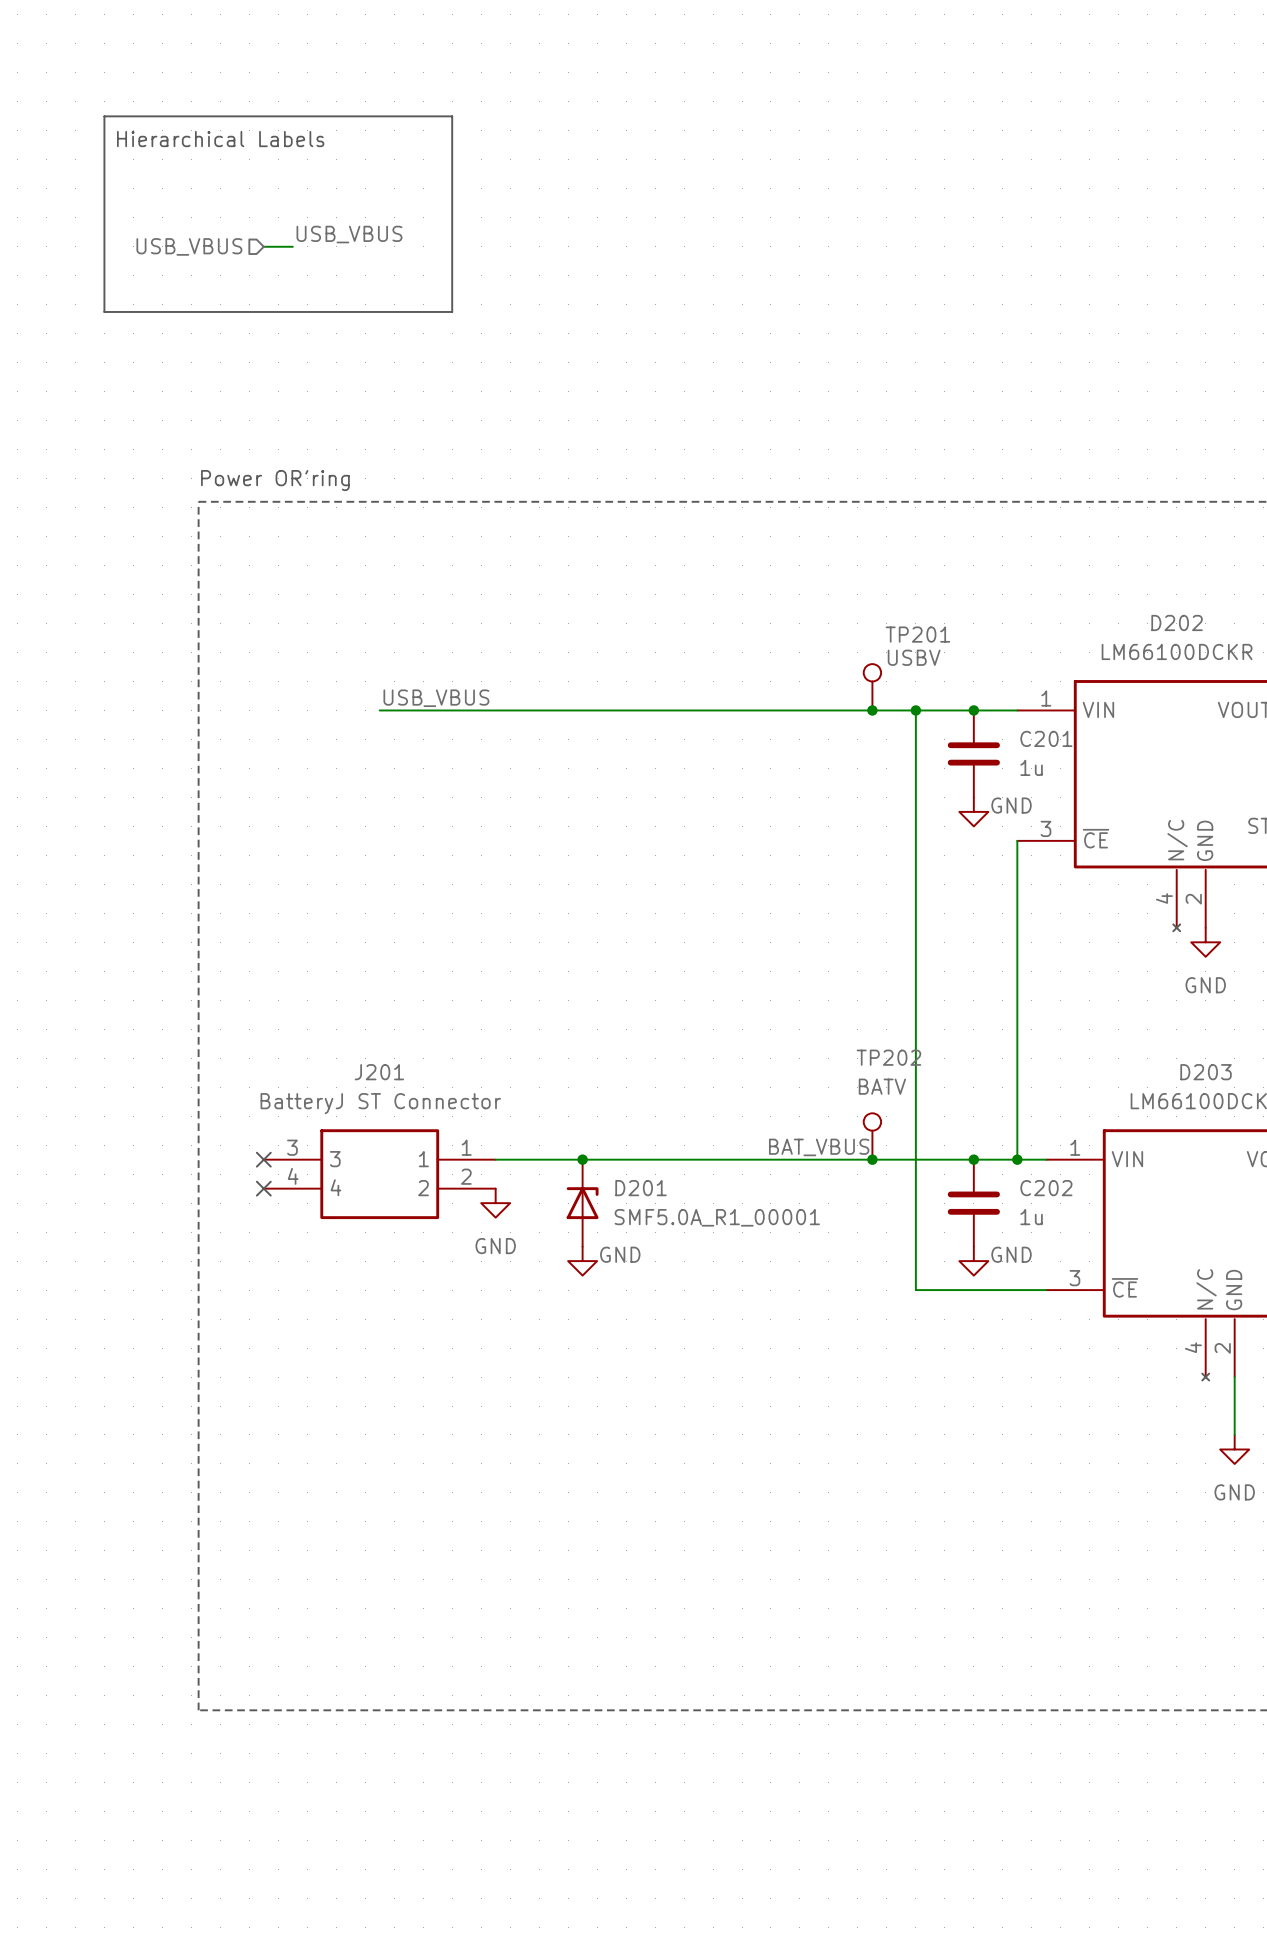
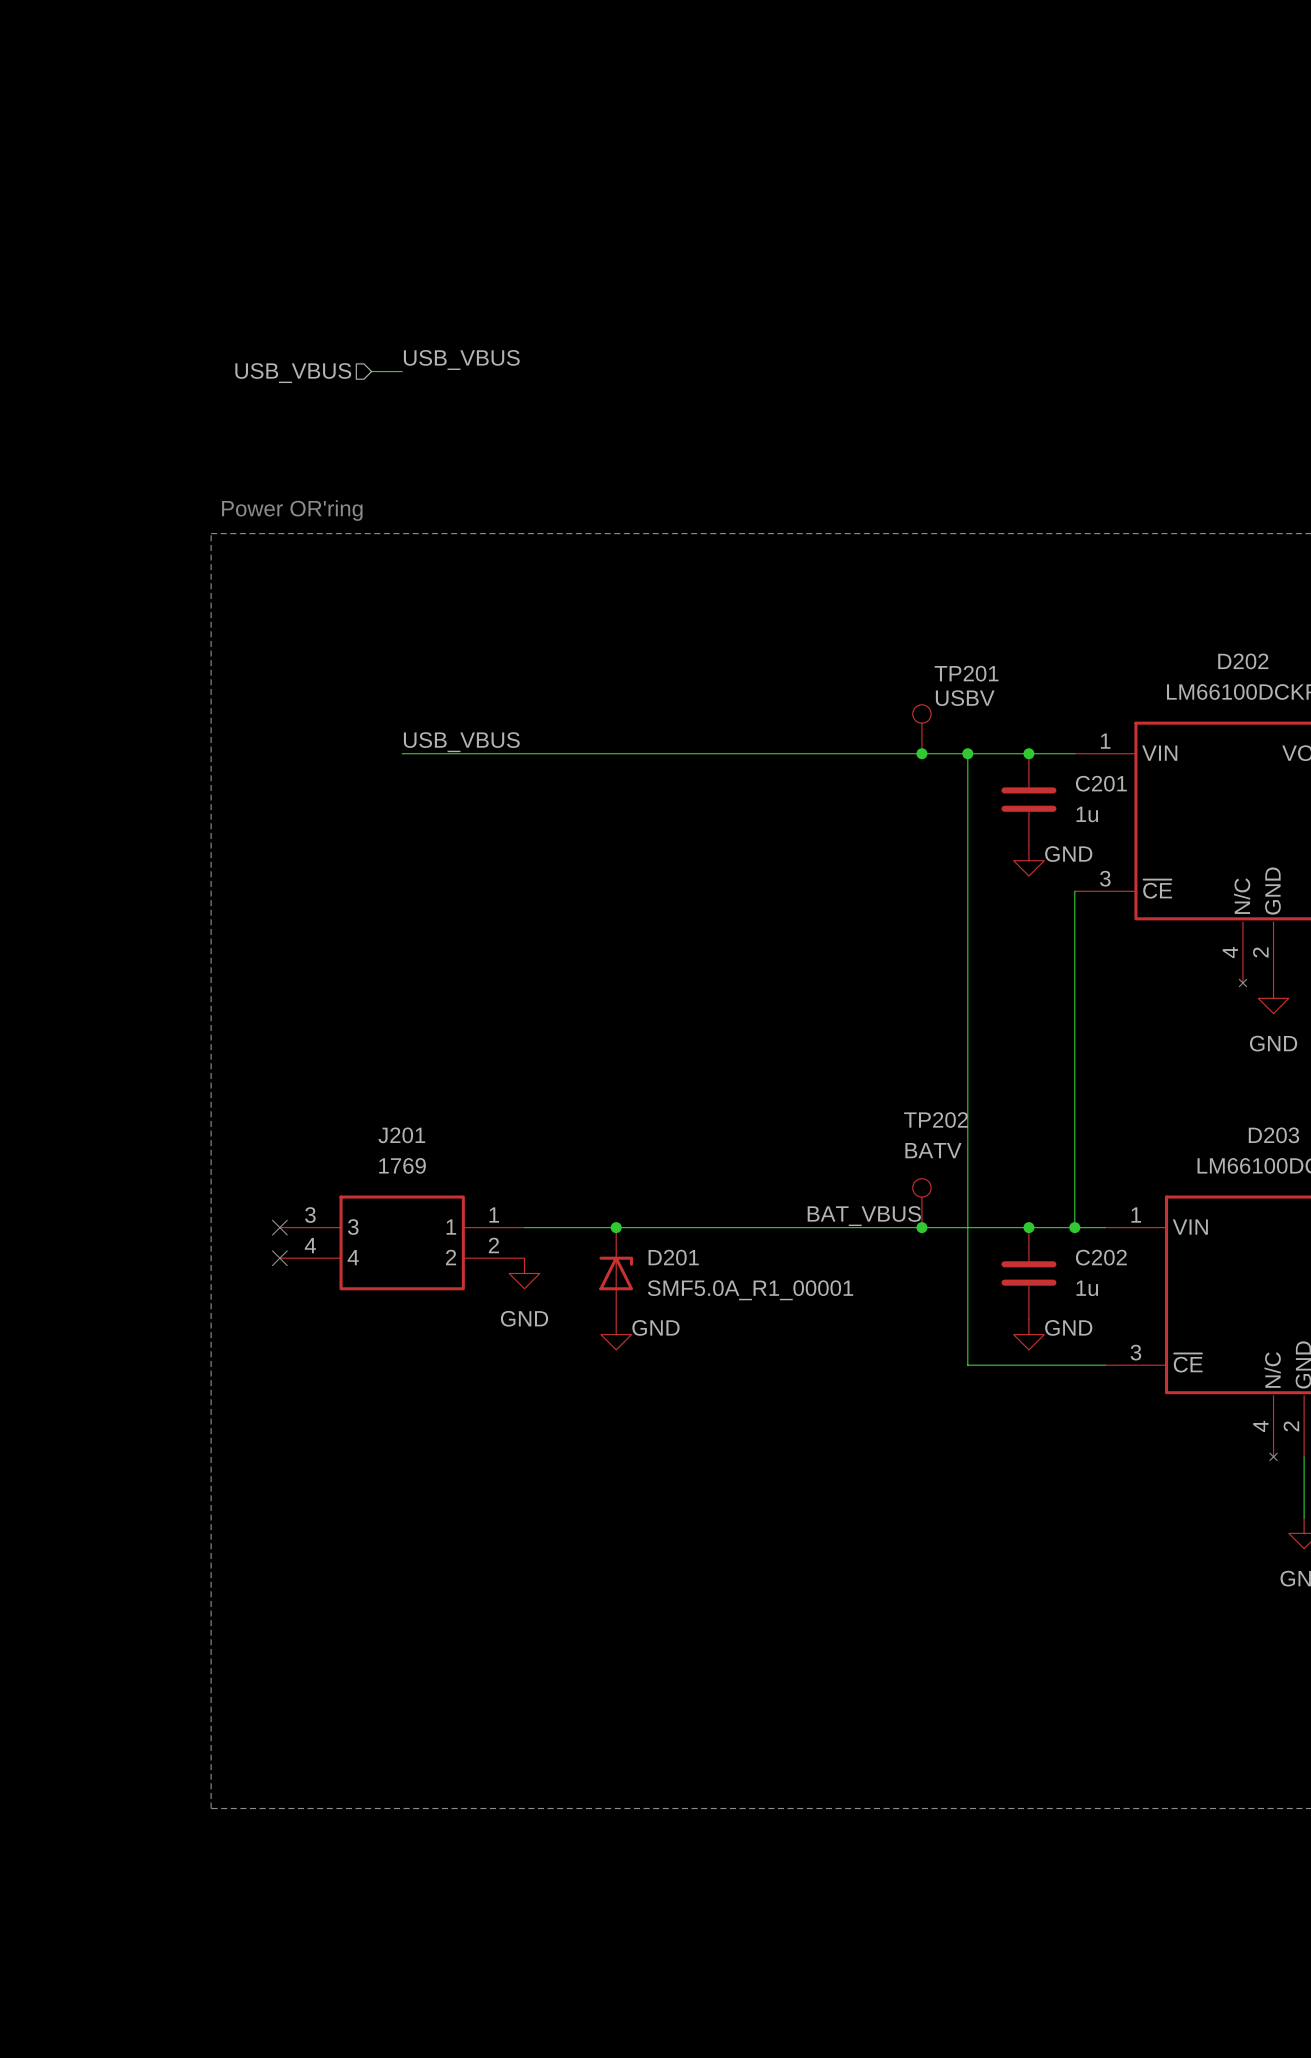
line: (104, 116) (452, 116) (452, 311) (104, 311) (104, 116) -> none
text: Hierarchical Labels (220, 139) -> none
label position: USB_VBUS (349, 234) -> USB_VBUS (461, 360)
hierarchical label position: USB_VBUS (189, 246) -> USB_VBUS (293, 373)
wire: (263, 246) (292, 246) -> (371, 371) (402, 371)
J201 value: BatteryJ ST Connector (380, 1103) -> 1769 (402, 1165)

